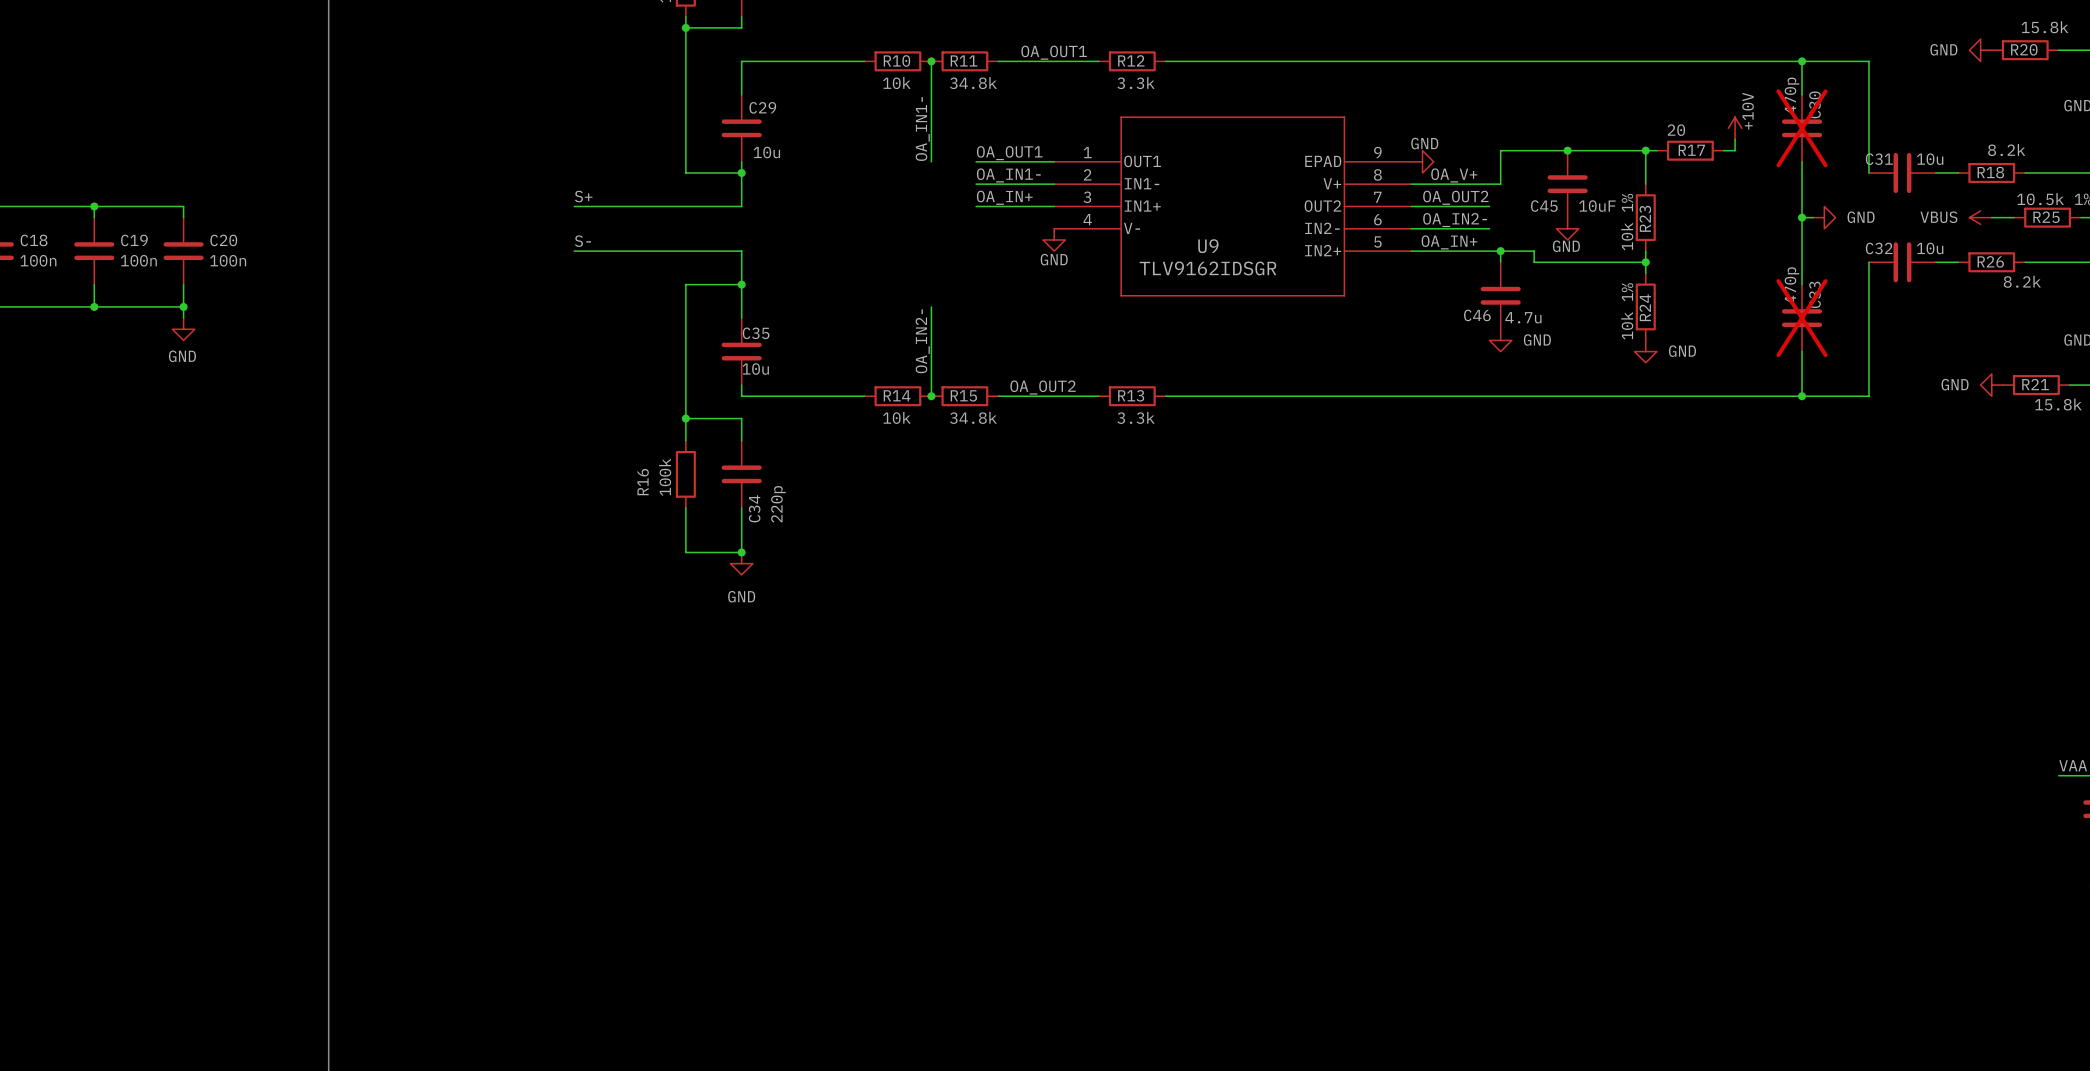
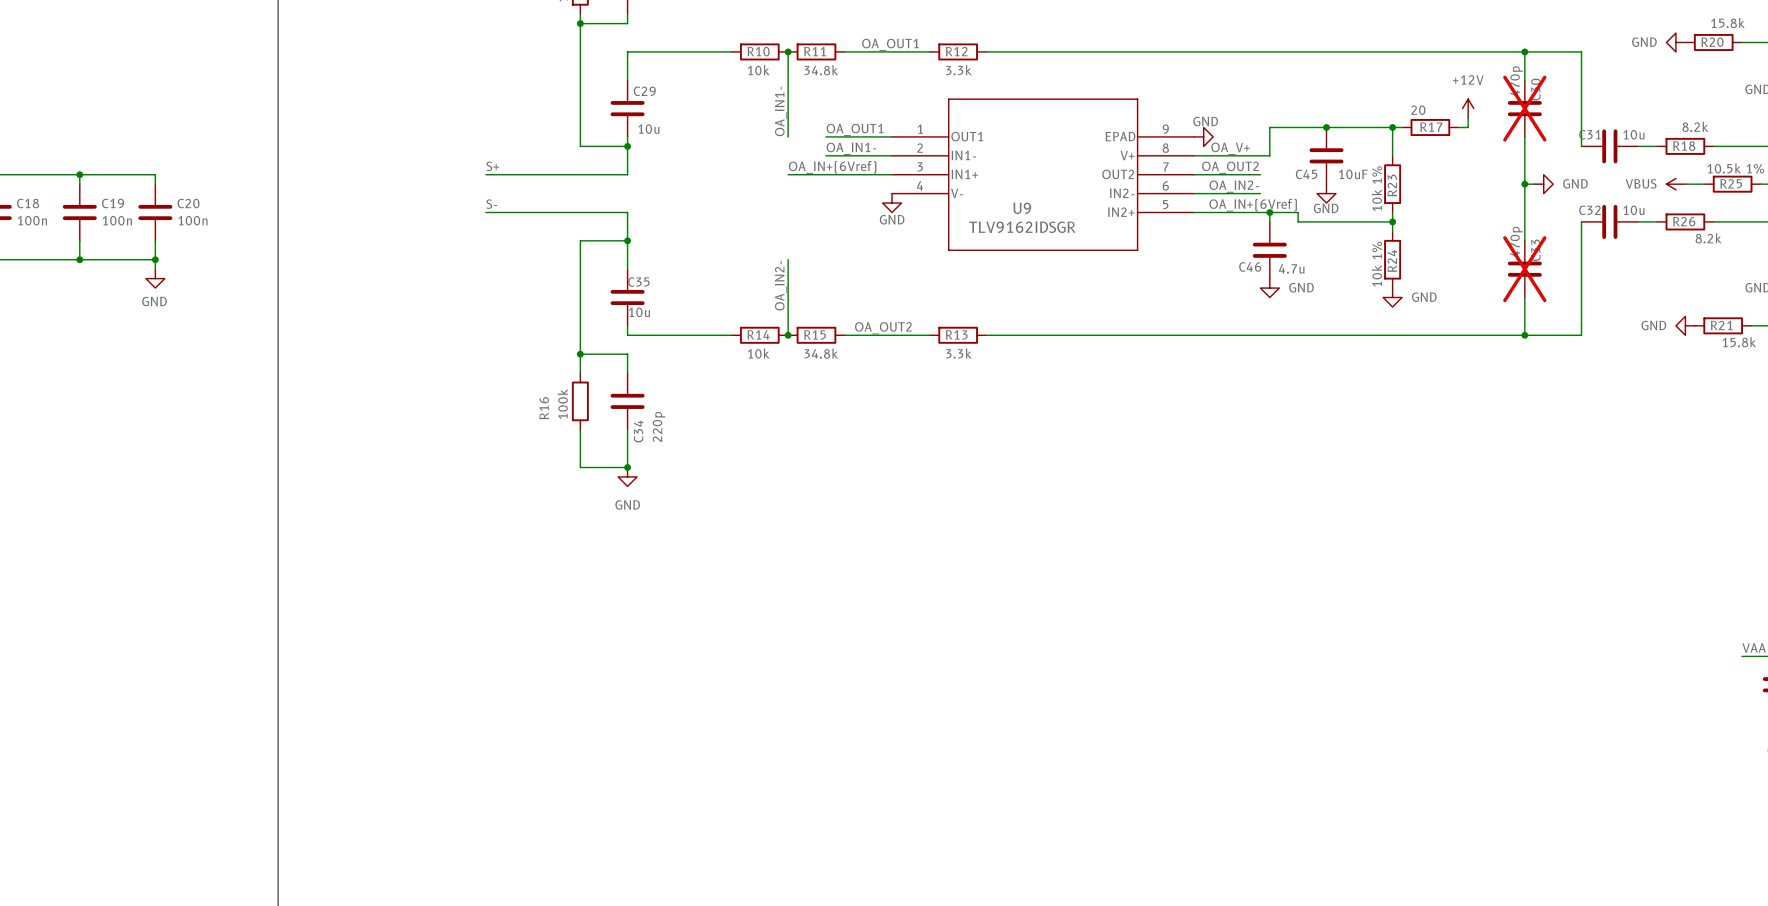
power symbol: +10V (1735, 128) -> +12V (1468, 108)
label: OA_IN+ (1004, 197) -> OA_IN+(6Vref) (832, 167)
wire: none -> (788, 174) (825, 174)
label: OA_IN+ (1449, 242) -> OA_IN+(6Vref) (1253, 205)

